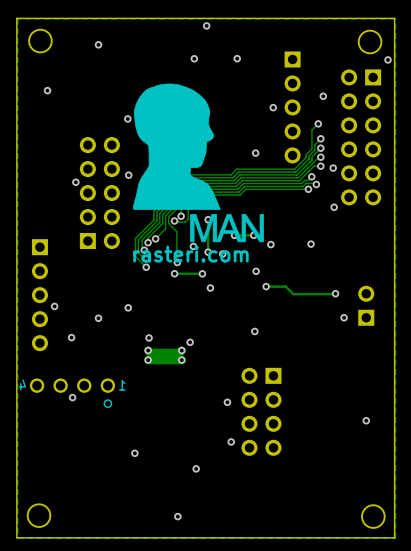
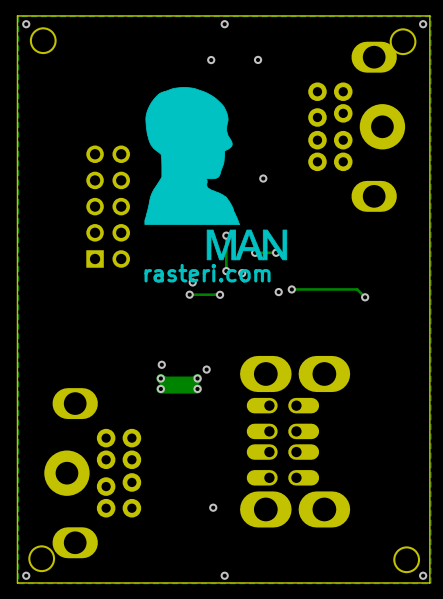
via: none -> (26, 24)
via: (98, 44) -> none
via position: (387, 59) -> (423, 24)
via: (47, 90) -> none
via: (323, 96) -> none
via: (273, 107) -> none
part: (292, 107) -> none
via: (127, 118) -> none
part: none -> (356, 126)
track: (318, 123) (311, 130) (311, 148) (294, 169) (236, 169) (231, 174) (190, 174) (154, 211) (154, 219) (135, 238) (135, 256) (146, 267) -> none
via: (318, 123) -> none
part: (361, 137) -> none
track: (320, 138) (314, 144) (314, 150) (309, 155) (308, 159) -> none
via: (320, 138) -> none
track: (320, 148) (311, 157) (310, 161) -> none
via: (320, 148) -> none
via position: (255, 153) -> (263, 178)
track: (320, 157) (308, 167) -> none
via: (320, 157) -> none
track: (308, 159) (295, 172) (238, 172) (232, 177) (191, 177) (156, 212) (156, 221) (138, 239) (138, 252) (146, 258) -> none
track: (310, 161) (297, 174) (239, 174) (234, 180) (192, 180) (159, 213) (159, 222) (142, 239) (142, 248) (144, 250) -> none
track: (320, 166) (314, 166) (309, 170) -> none
via: (320, 166) -> none
track: (308, 167) (298, 177) (241, 177) (235, 183) (193, 183) (162, 214) (162, 223) (148, 238) (148, 242) -> none
via: (333, 168) -> none
track: (309, 170) (299, 180) (242, 180) (236, 186) (195, 186) (165, 215) (165, 229) (155, 238) -> none
via: (128, 175) -> none
track: (311, 176) (301, 183) (243, 183) (237, 189) (196, 189) (168, 216) (168, 223) (176, 231) (177, 262) -> none
via: (311, 176) -> none
via: (75, 182) -> none
track: (316, 184) (305, 183) (302, 186) (244, 186) (238, 192) (197, 192) (181, 208) (181, 216) -> none
via: (316, 184) -> none
track: (308, 189) (245, 189) (240, 195) (198, 195) (188, 205) (188, 219) (185, 222) (174, 220) -> none
via: (308, 189) -> none
via: (334, 207) -> none
via: (181, 216) -> none
via: (174, 220) -> none
via: (155, 238) -> none
via: (148, 242) -> none
via: (270, 244) -> none
via: (311, 244) -> none
via: (193, 246) -> none
via: (144, 250) -> none
via: (146, 267) -> none
track: none -> (291, 289) (357, 289) (365, 297)
via: none -> (291, 289)
track: (266, 286) (285, 286) (293, 294) (335, 293) -> none
via: (266, 286) -> none
via: (210, 288) -> none
via position: (335, 293) -> (365, 297)
part: (39, 295) -> none
part: (366, 305) -> none
via: (54, 306) -> none
via: (128, 307) -> none
via: (344, 317) -> none
via: (98, 318) -> none
via: (254, 331) -> none
via: (71, 337) -> none
part: (72, 393) -> none
via: (72, 397) -> none
via: (227, 402) -> none
part: none -> (295, 441)
part: (261, 411) -> none
via: (366, 420) -> none
part: none -> (92, 473)
via: (231, 441) -> none
via: (134, 453) -> none
via position: (177, 516) -> (224, 575)
via: none -> (26, 575)
via: none -> (423, 575)

